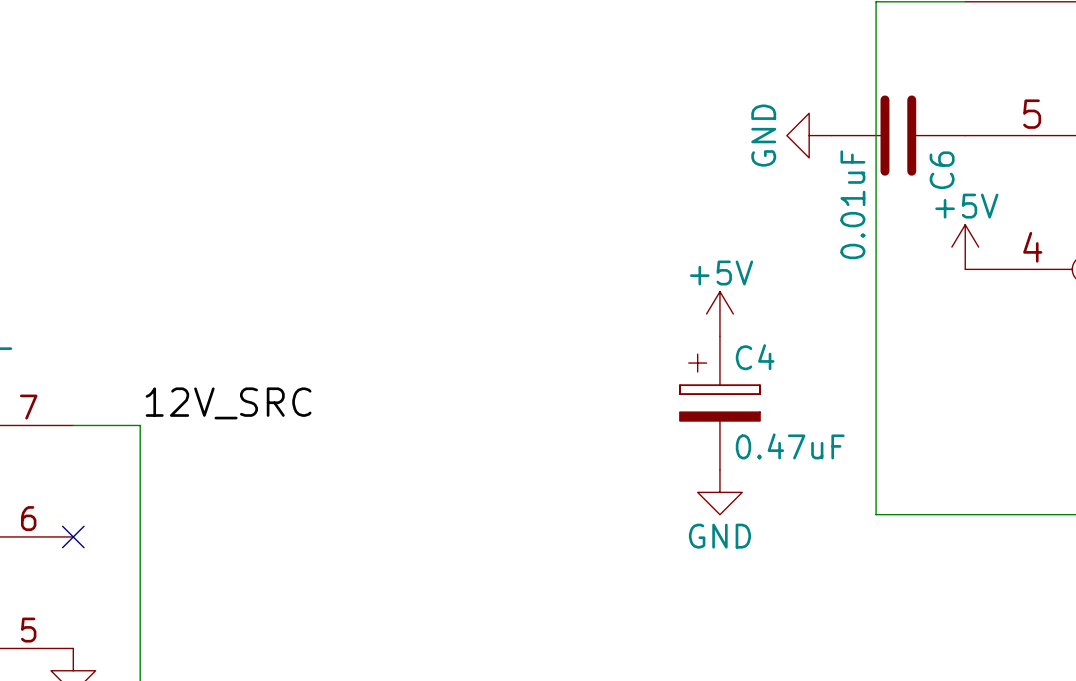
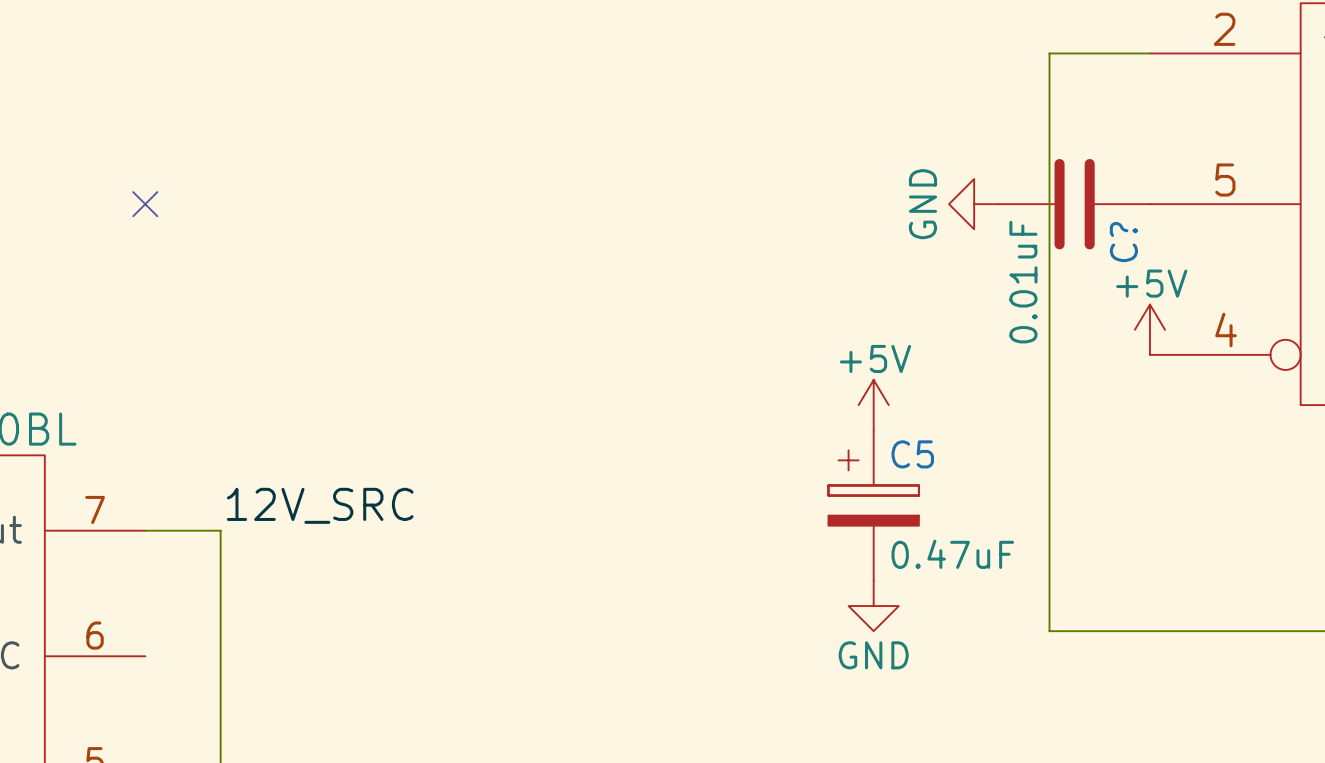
no-connect mark: none -> (145, 204)
C6 name: C6 (942, 170) -> C? (1123, 242)
C4 name: C4 (755, 357) -> C5 (912, 454)
no-connect mark: (73, 536) -> none

